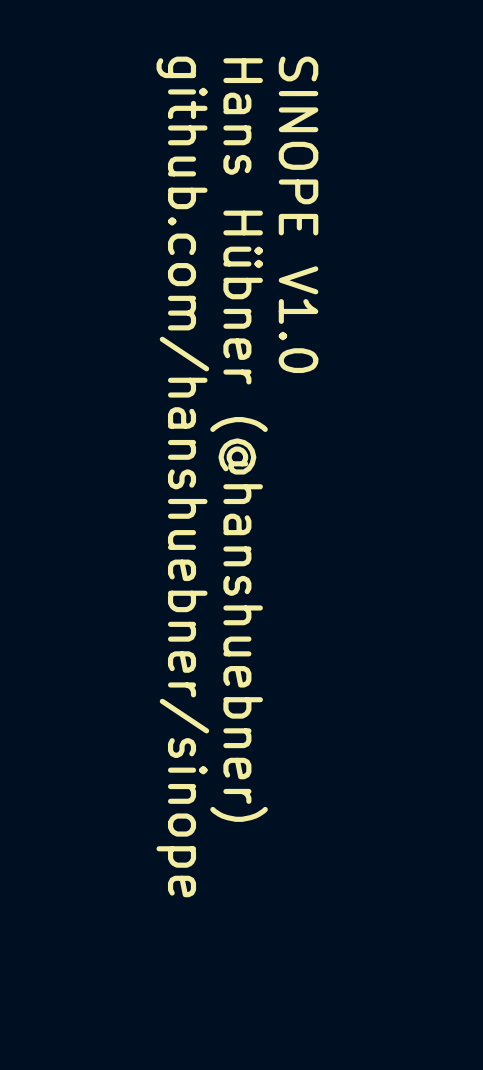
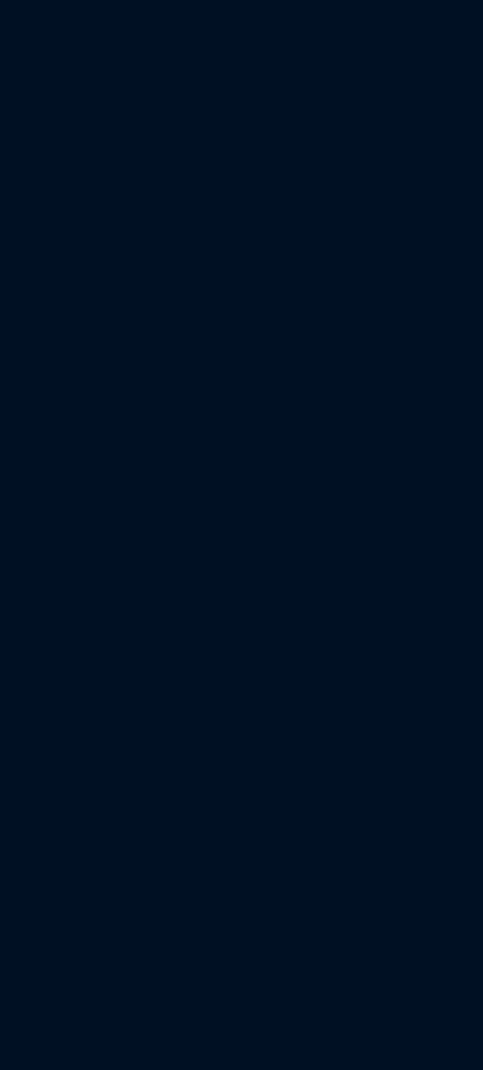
text: SINOPE V1.0 (298, 214) -> none
text: Hans Hübner (@hanshuebner) (239, 440) -> none
text: github.com/hanshuebner/sinope (182, 476) -> none

